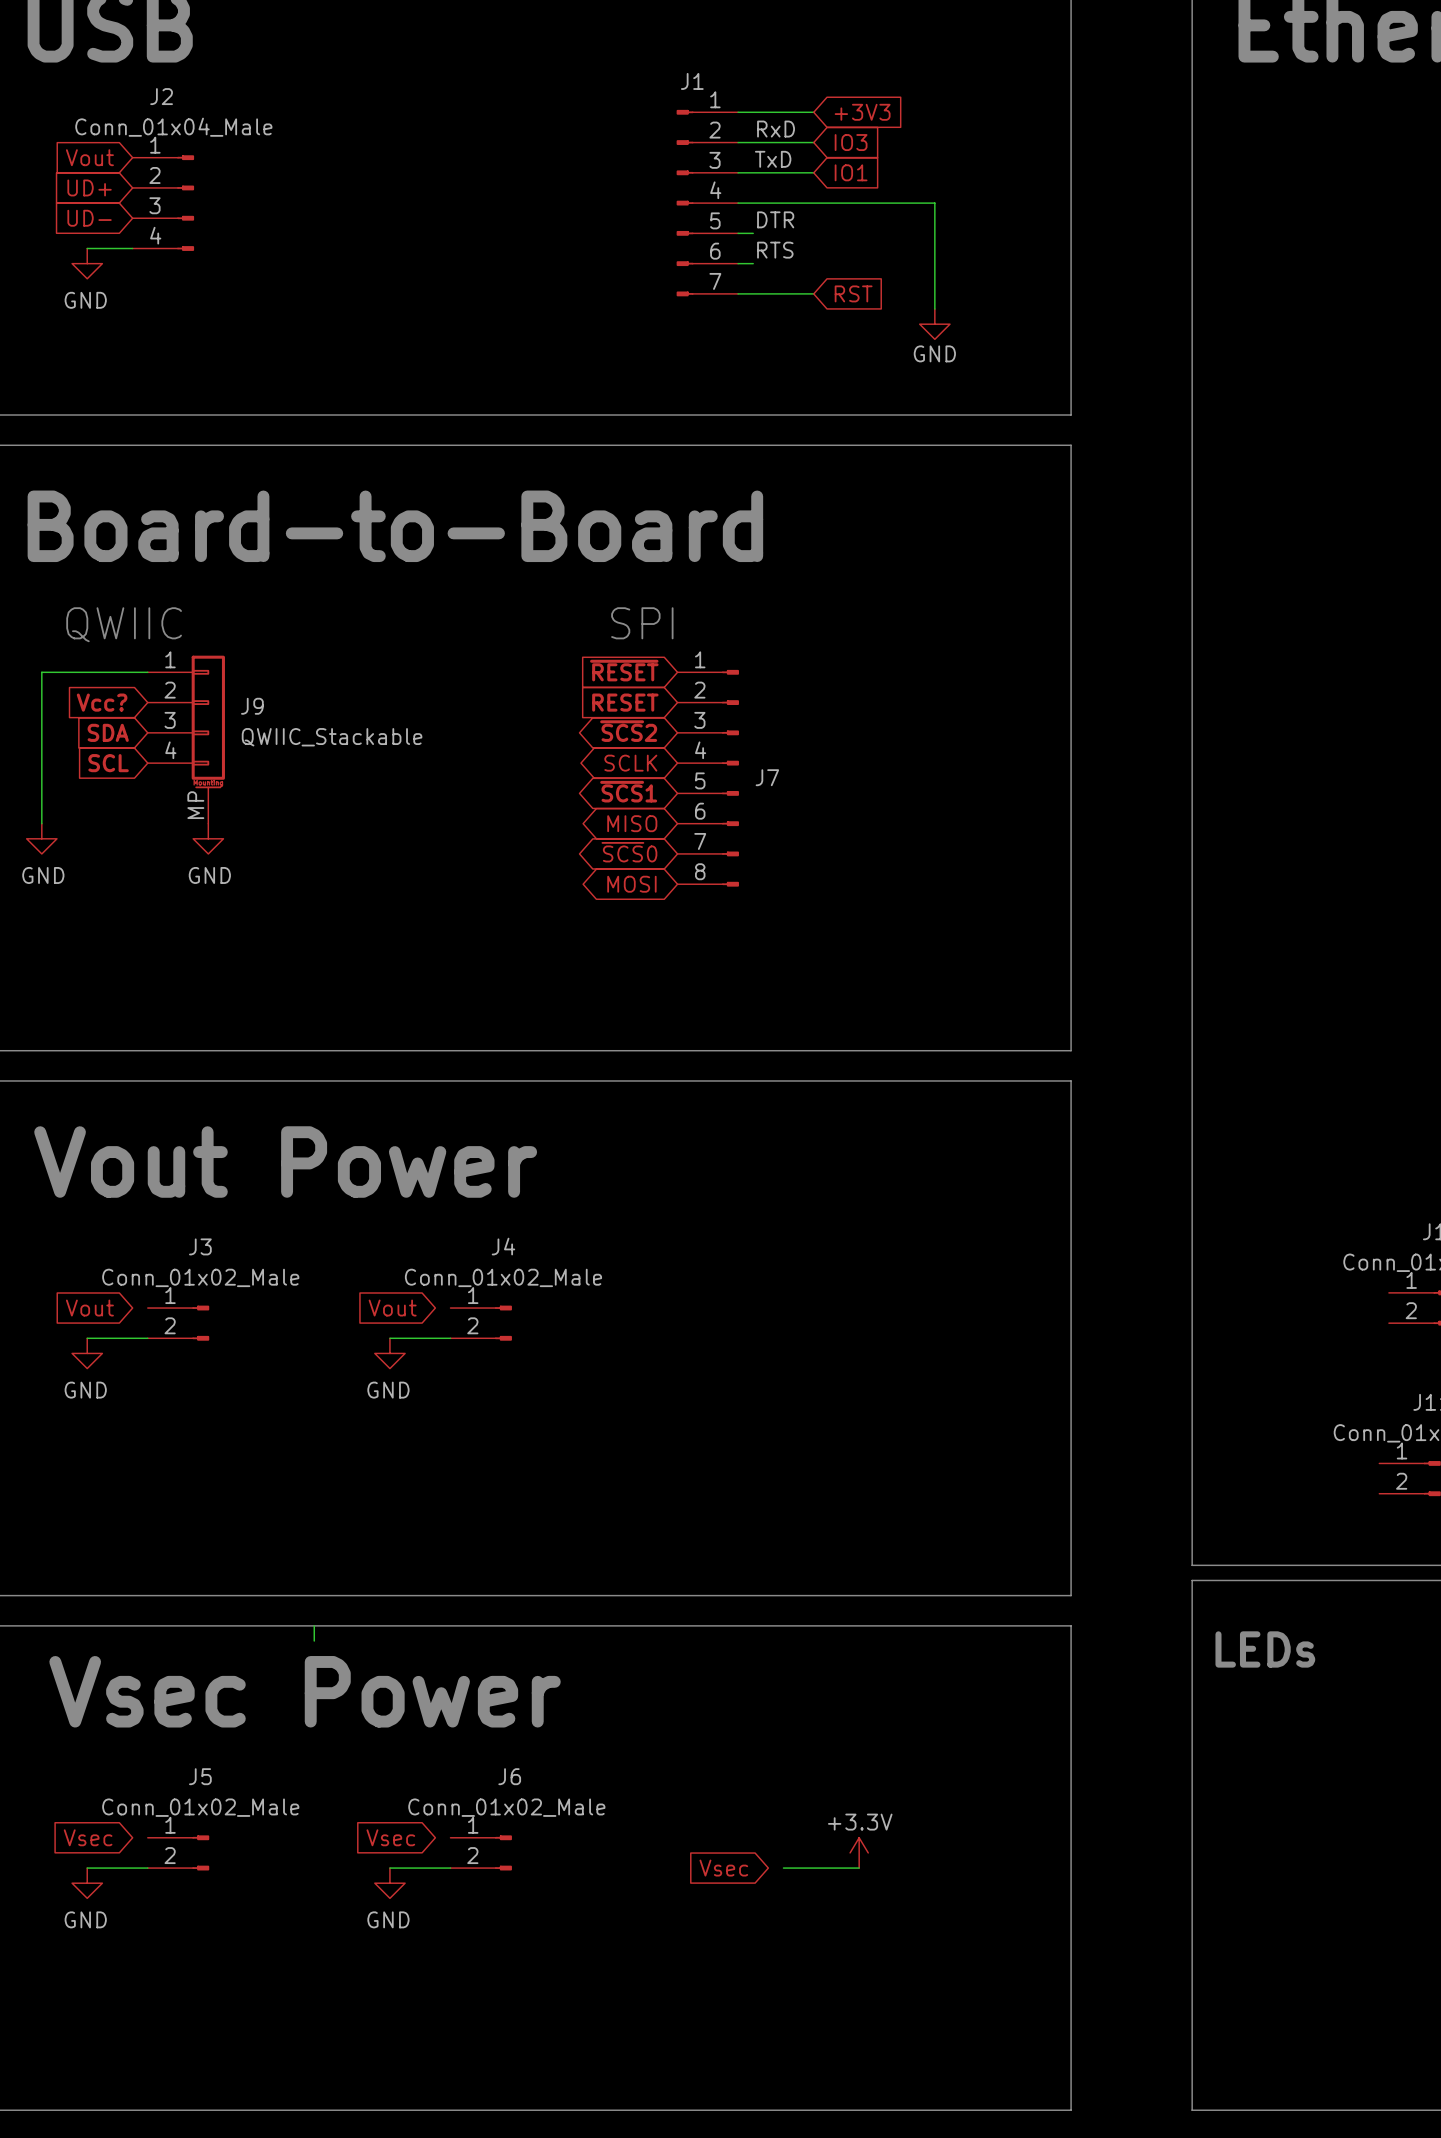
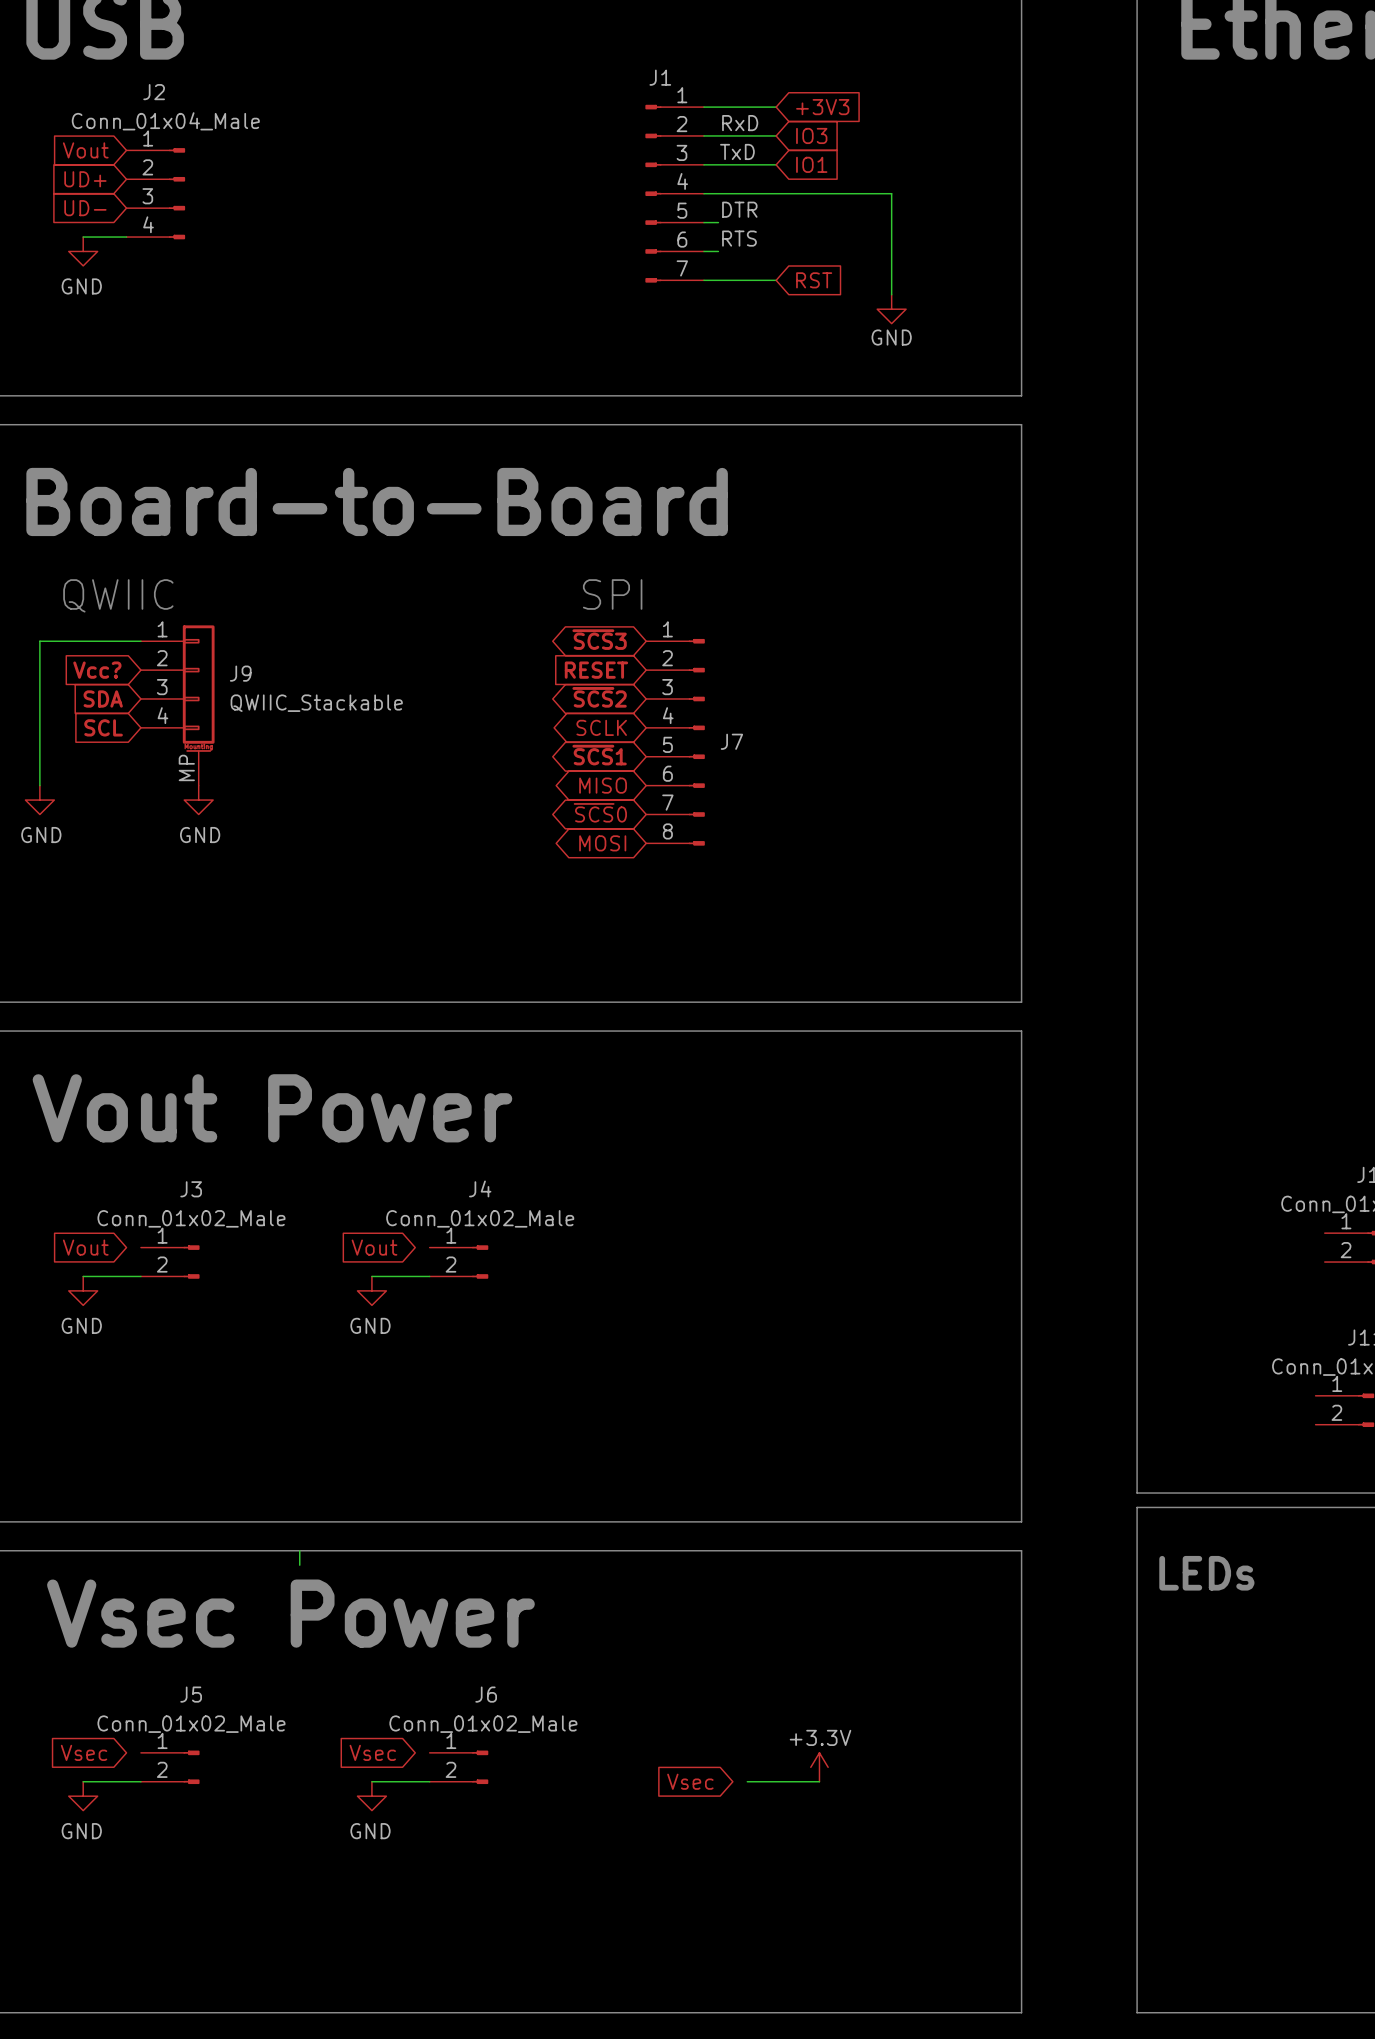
global label shape: input (624, 670) -> bidirectional (599, 639)
global label: ~{RESET} (624, 670) -> ~{SCS}3 (599, 639)

